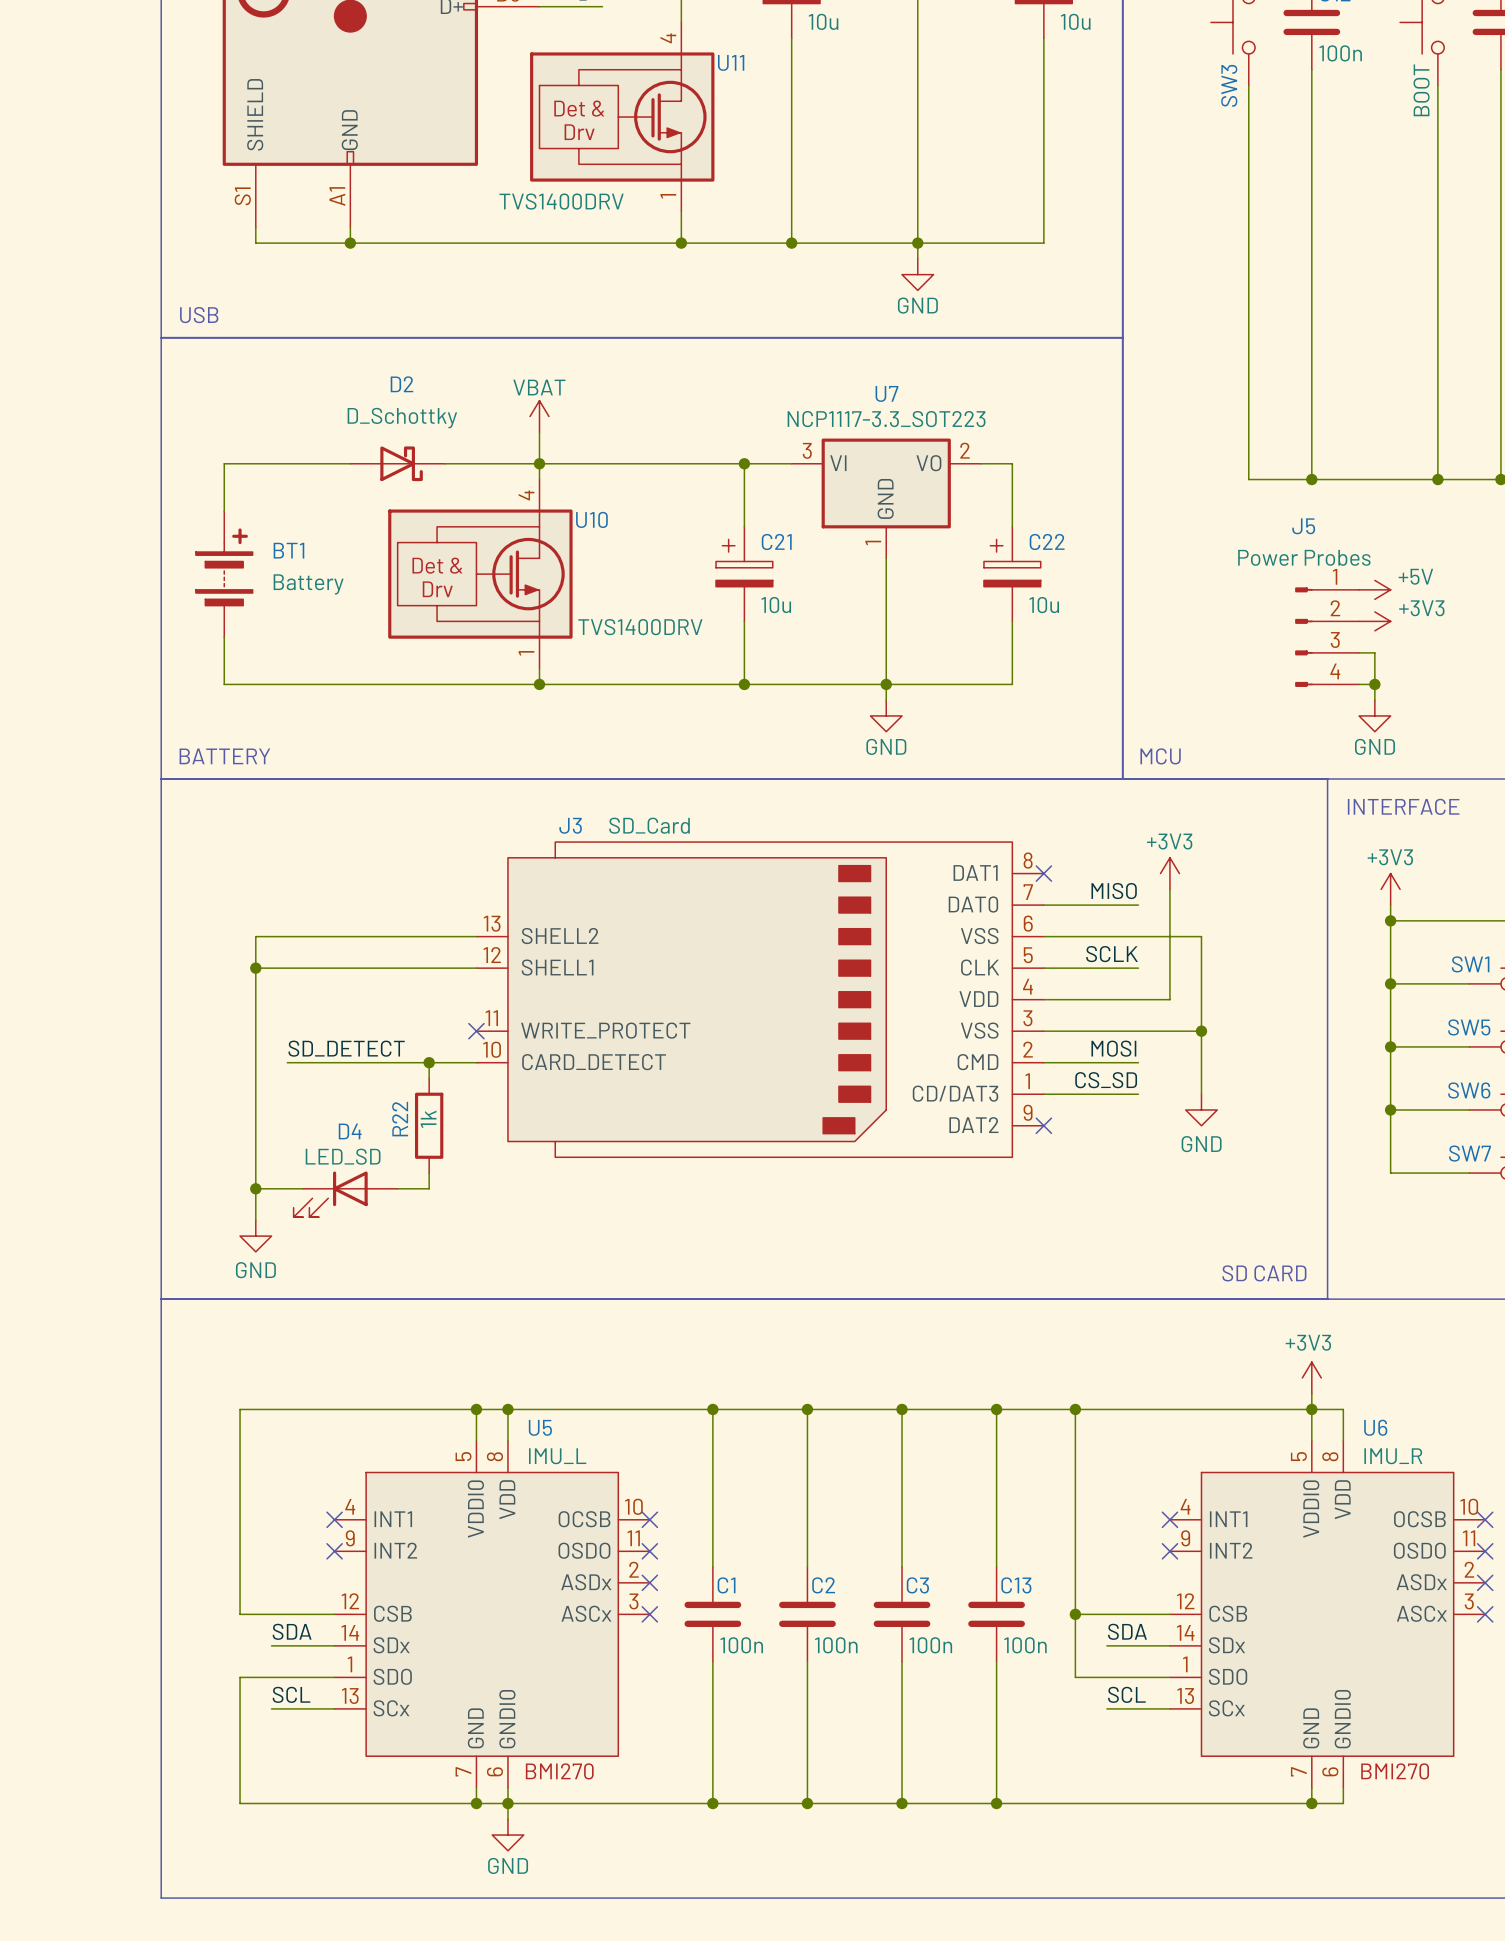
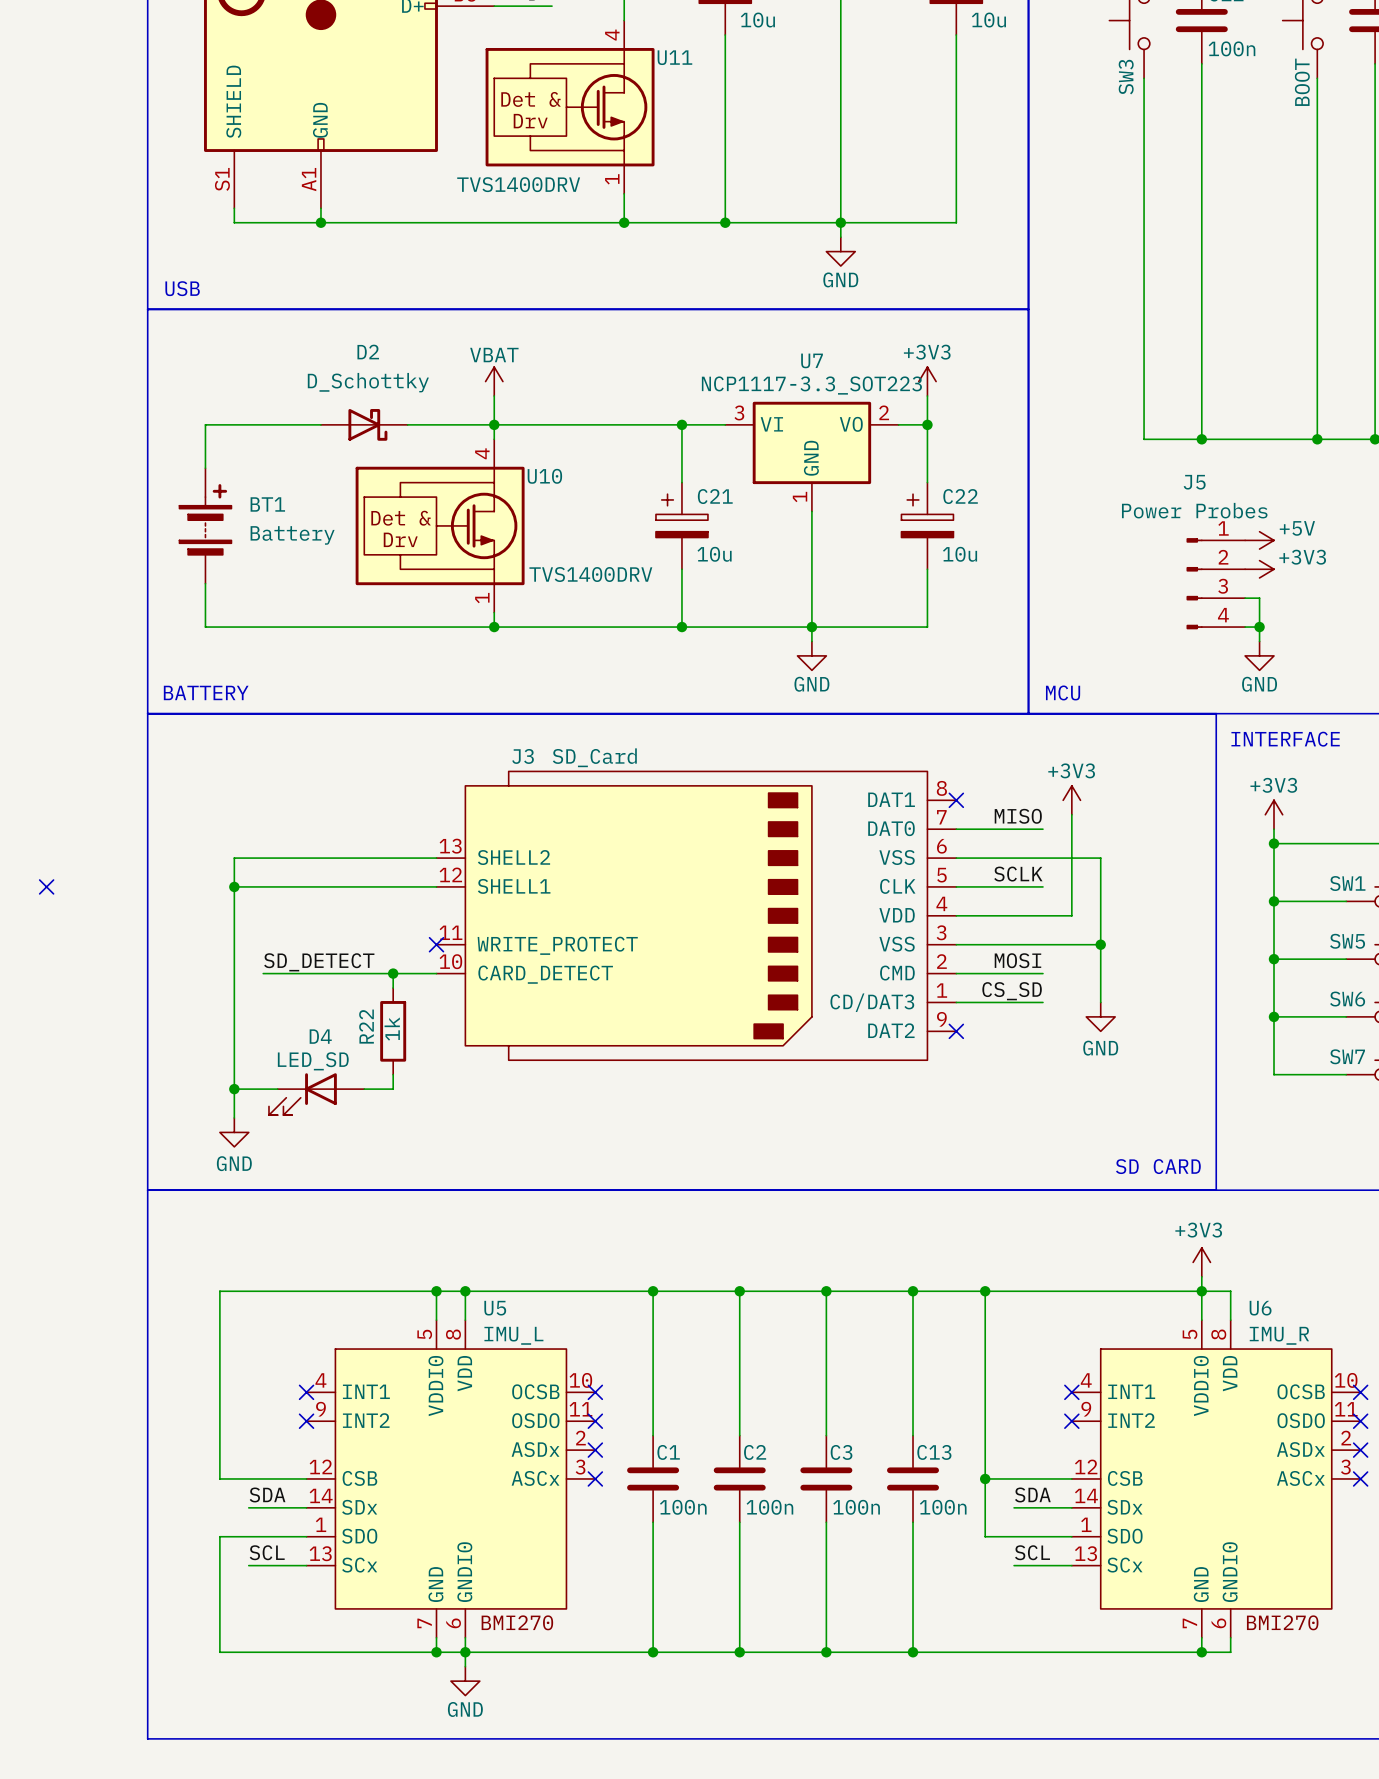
power symbol: none -> +3V3 (927, 381)
wire: none -> (927, 396) (927, 424)
junction: none -> (927, 424)
no-connect mark: none -> (46, 886)

